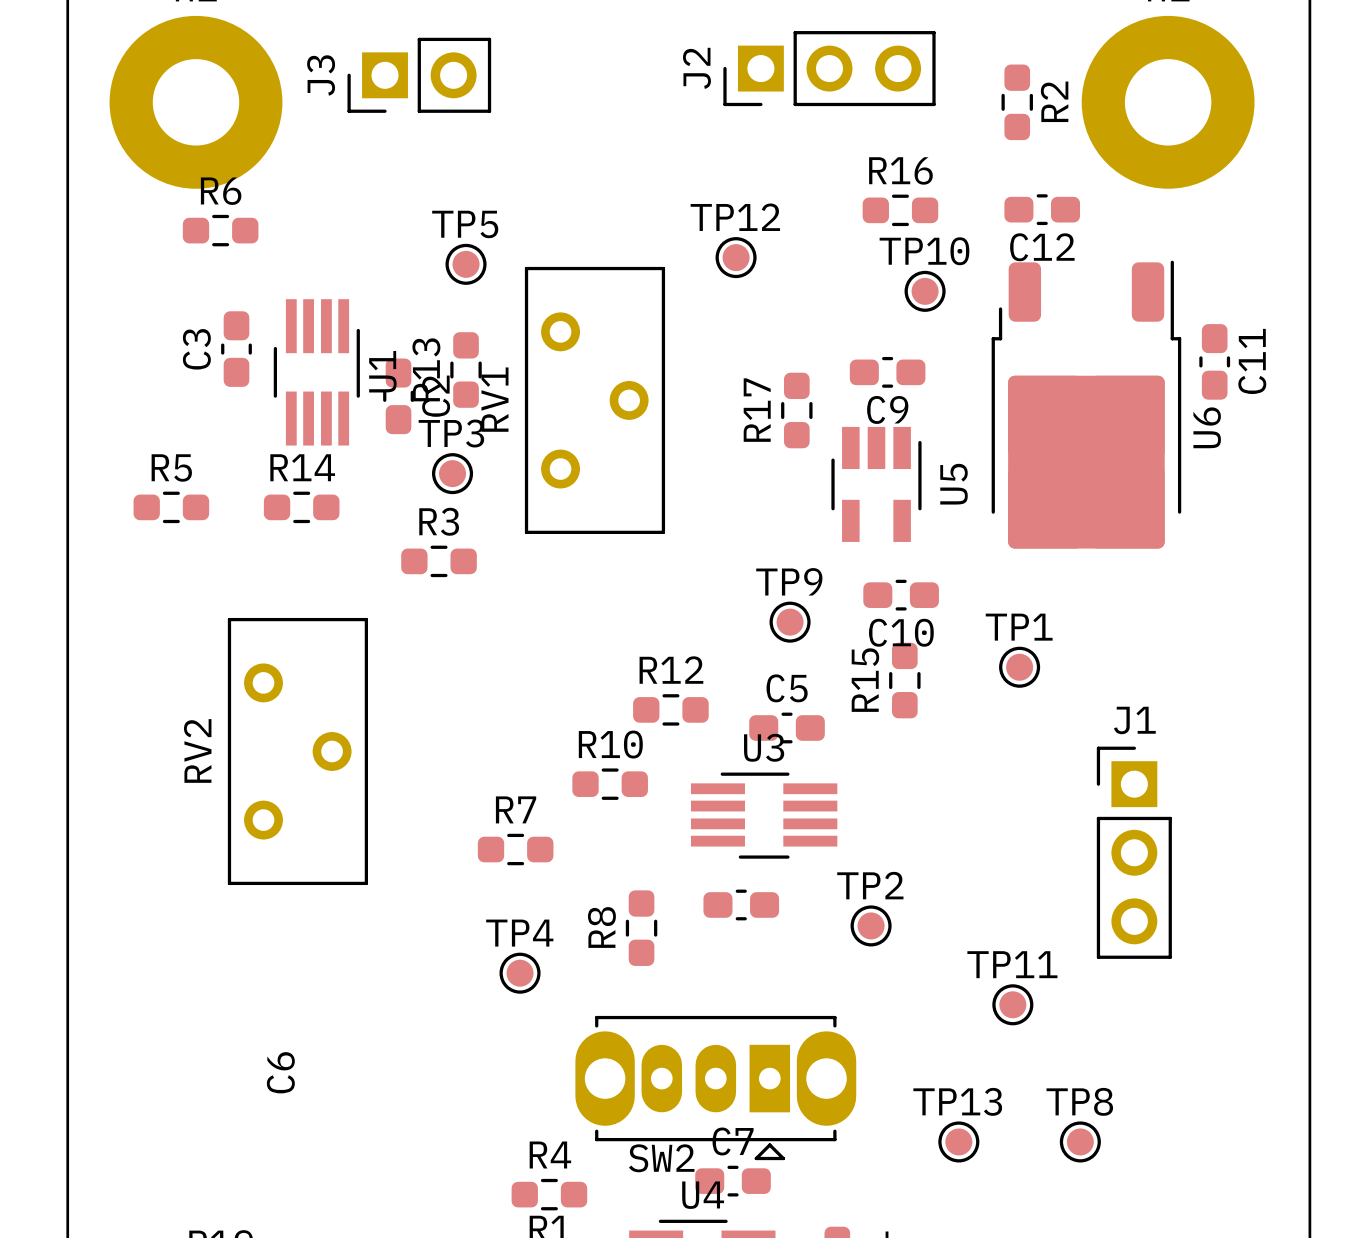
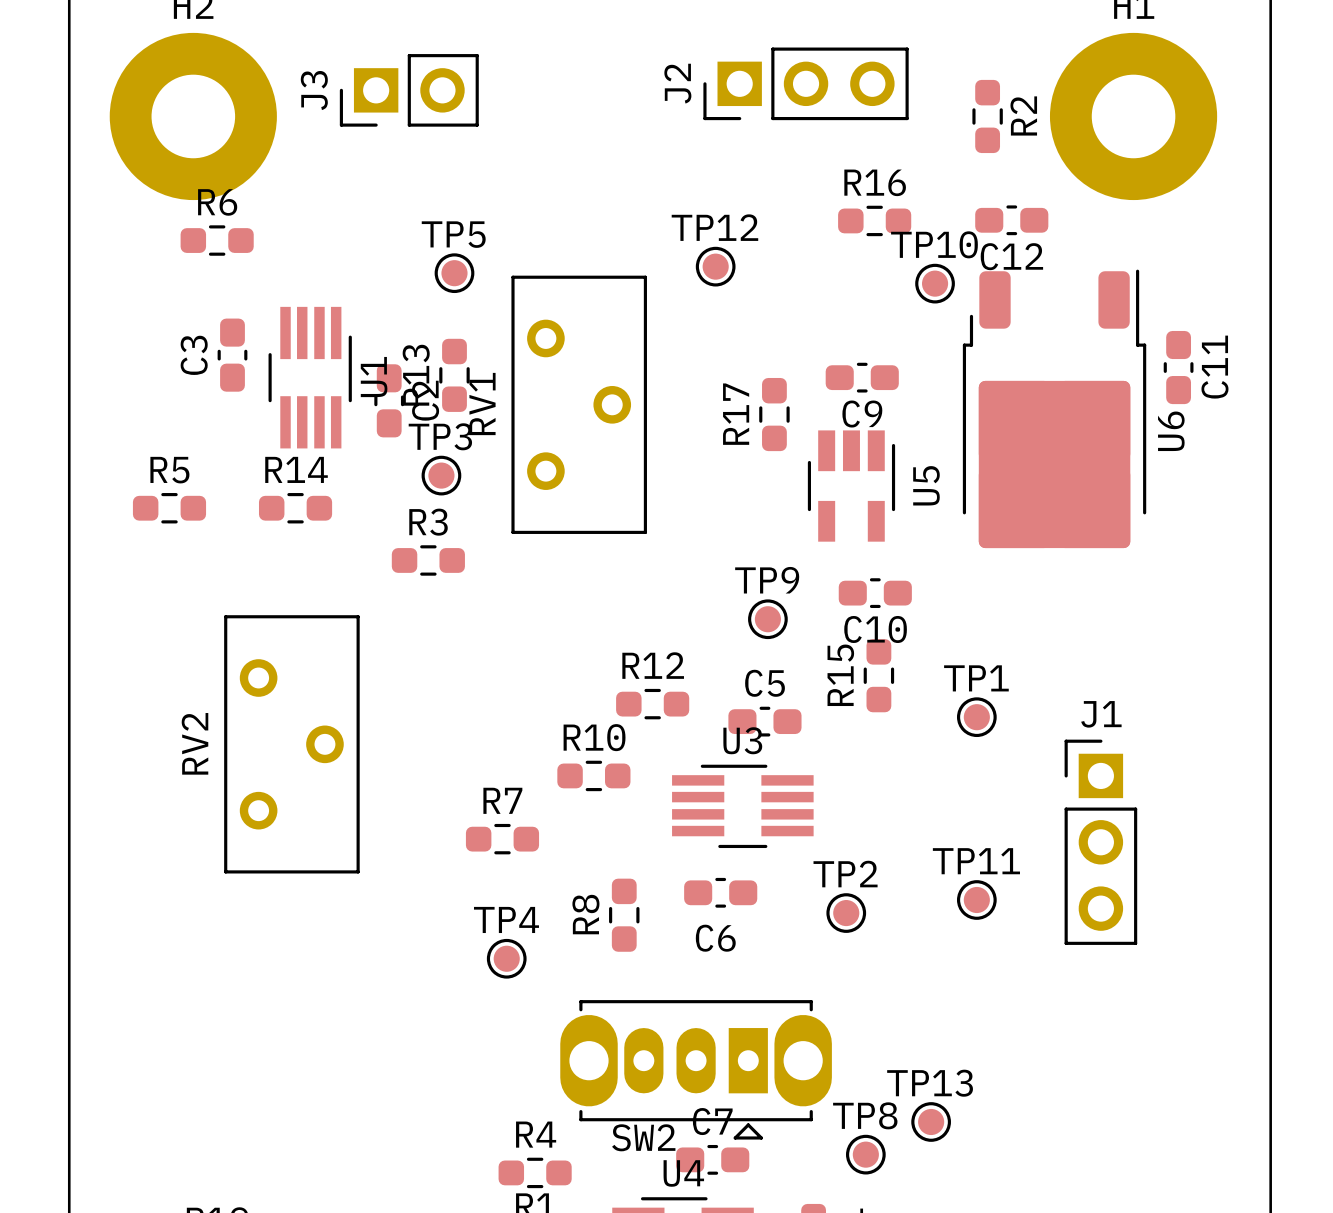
TP10 position: (925, 291) -> (935, 283)
TP1 position: (1019, 667) -> (976, 717)
TP11 position: (1012, 1004) -> (976, 899)
C6 name rotation: 0° (280, 1072) -> 90° clockwise (715, 938)
C6 name position: C6 (280, 1072) -> C6 (715, 938)
TP8 position: (1080, 1141) -> (865, 1154)

